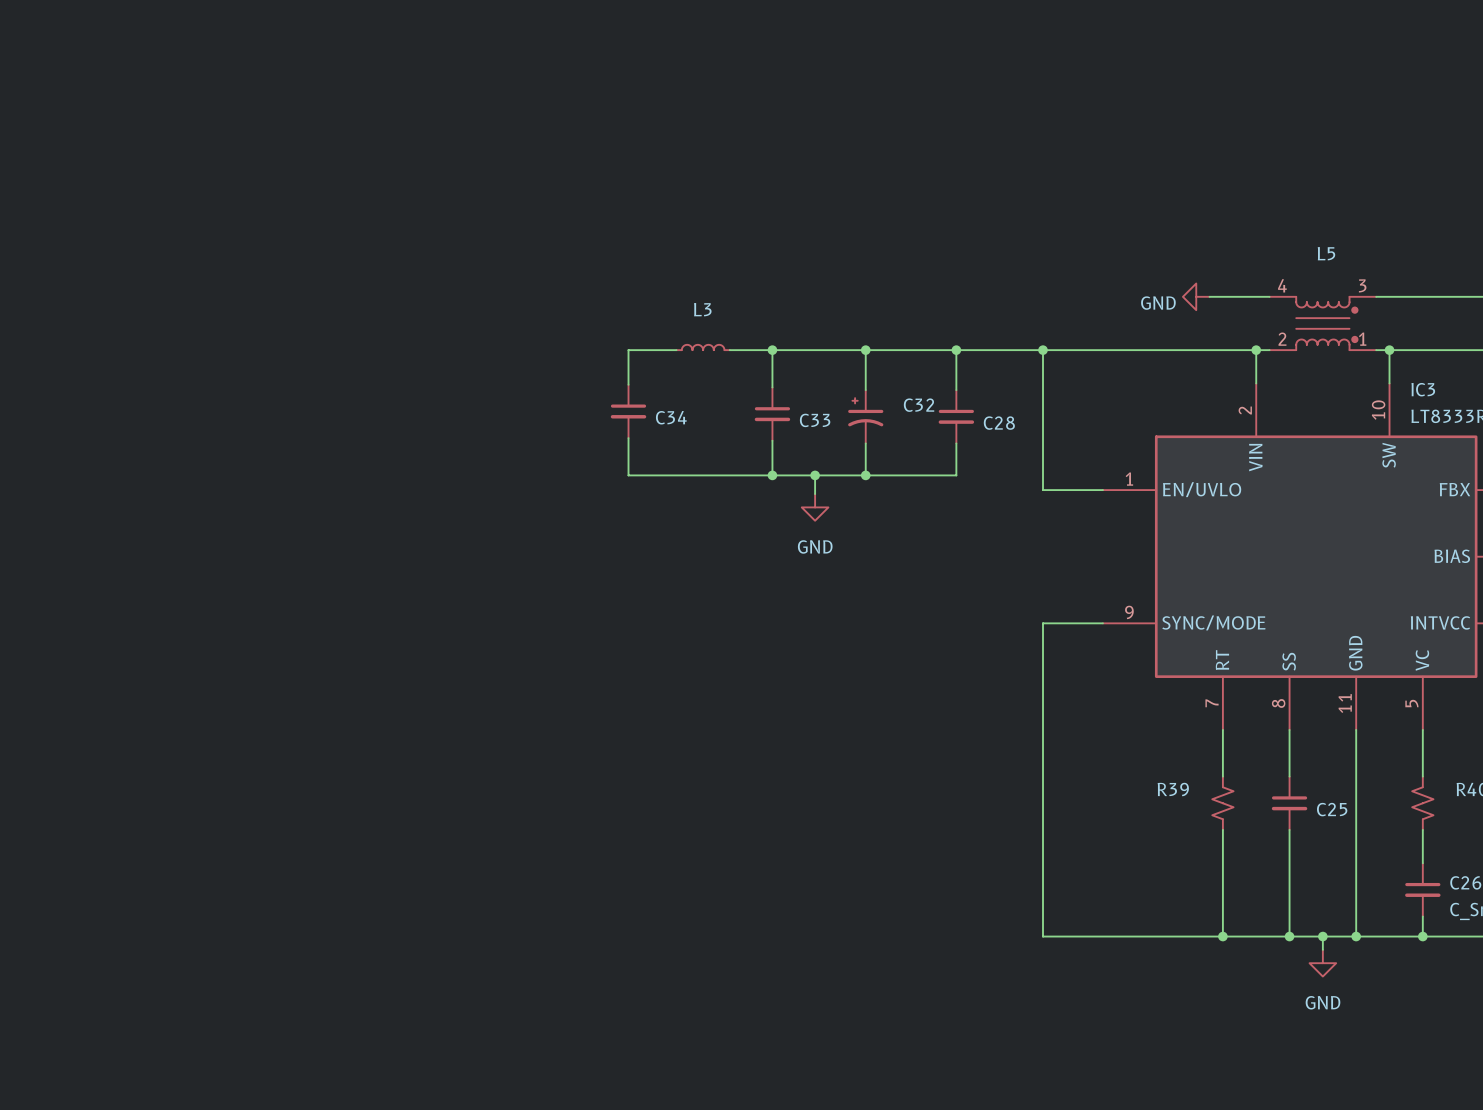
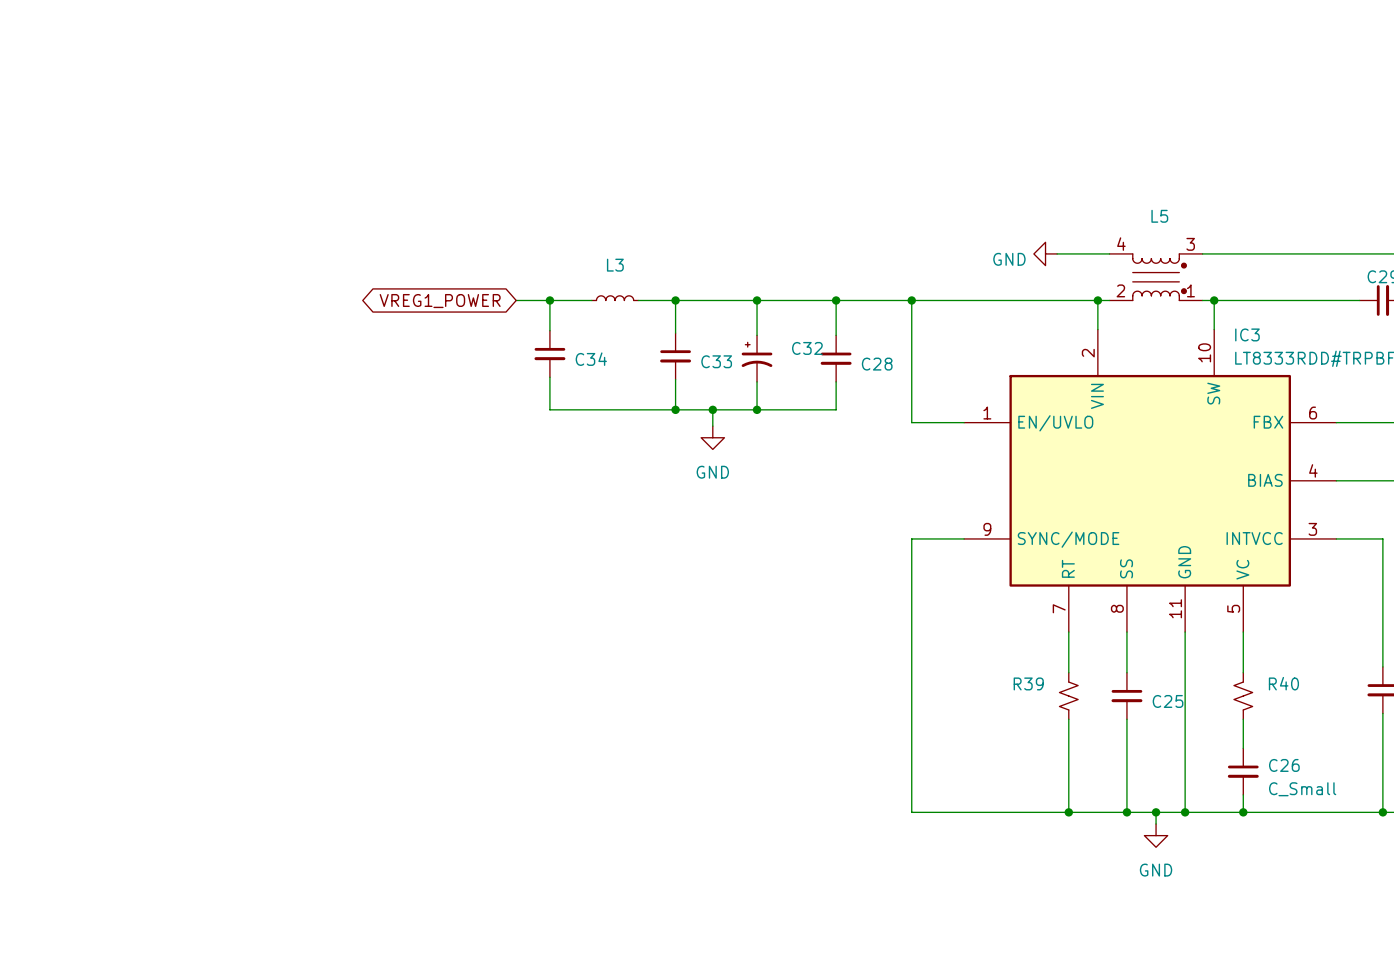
wire: none -> (516, 300) (549, 300)
junction: none -> (549, 300)
global label: none -> VREG1_POWER (440, 301)

